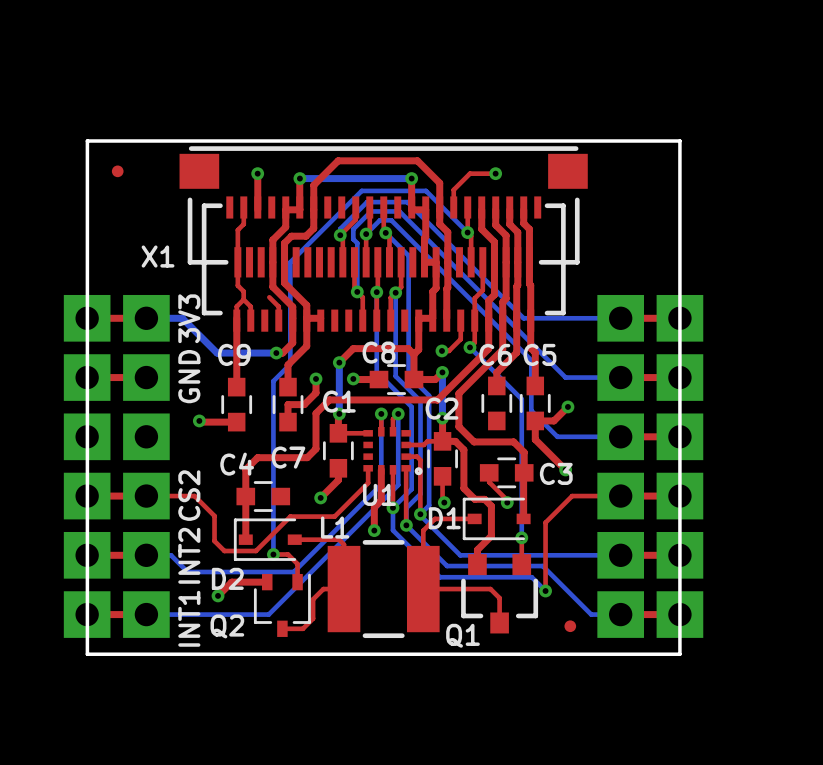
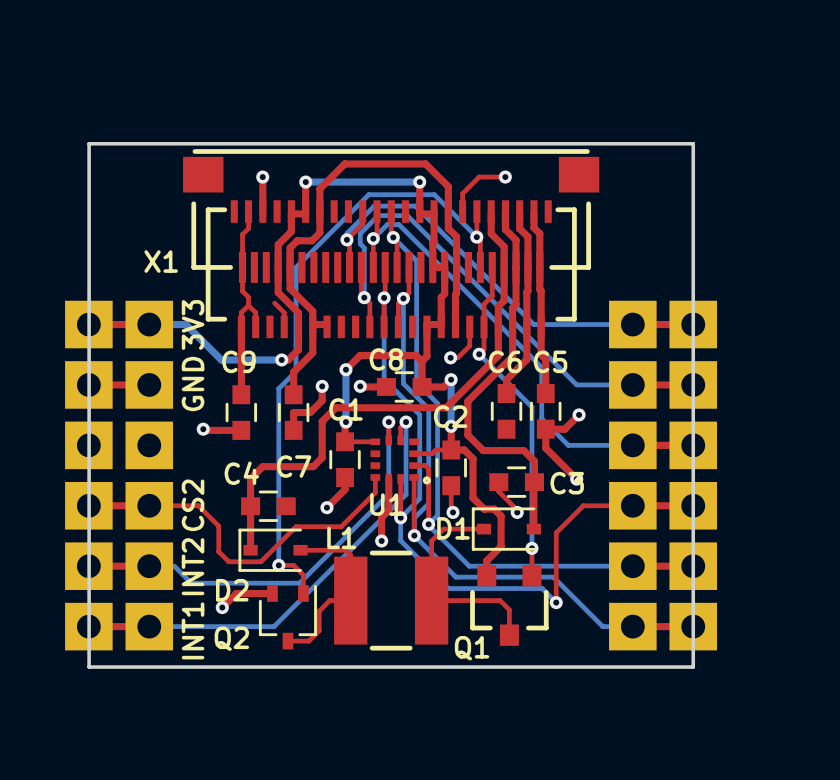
part: (117, 171) -> none
part: (570, 626) -> none

